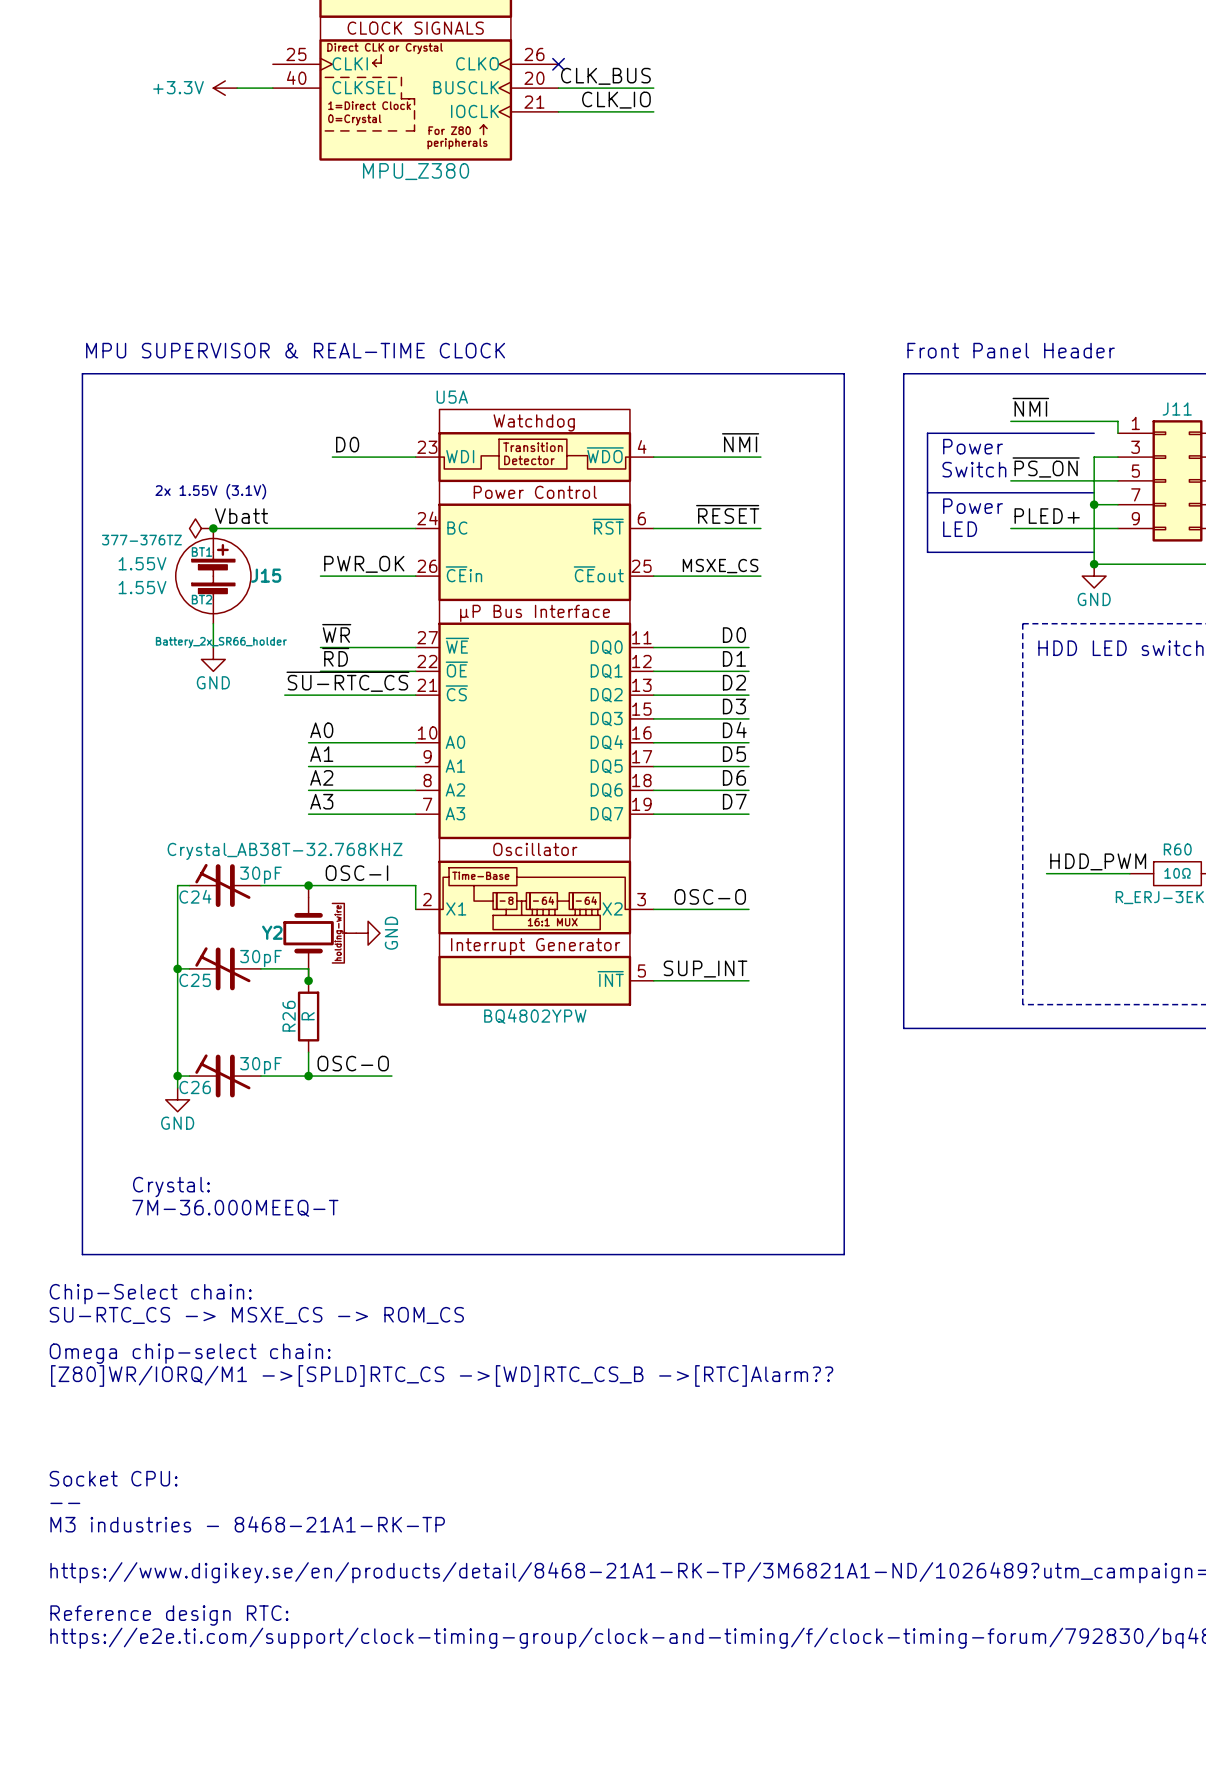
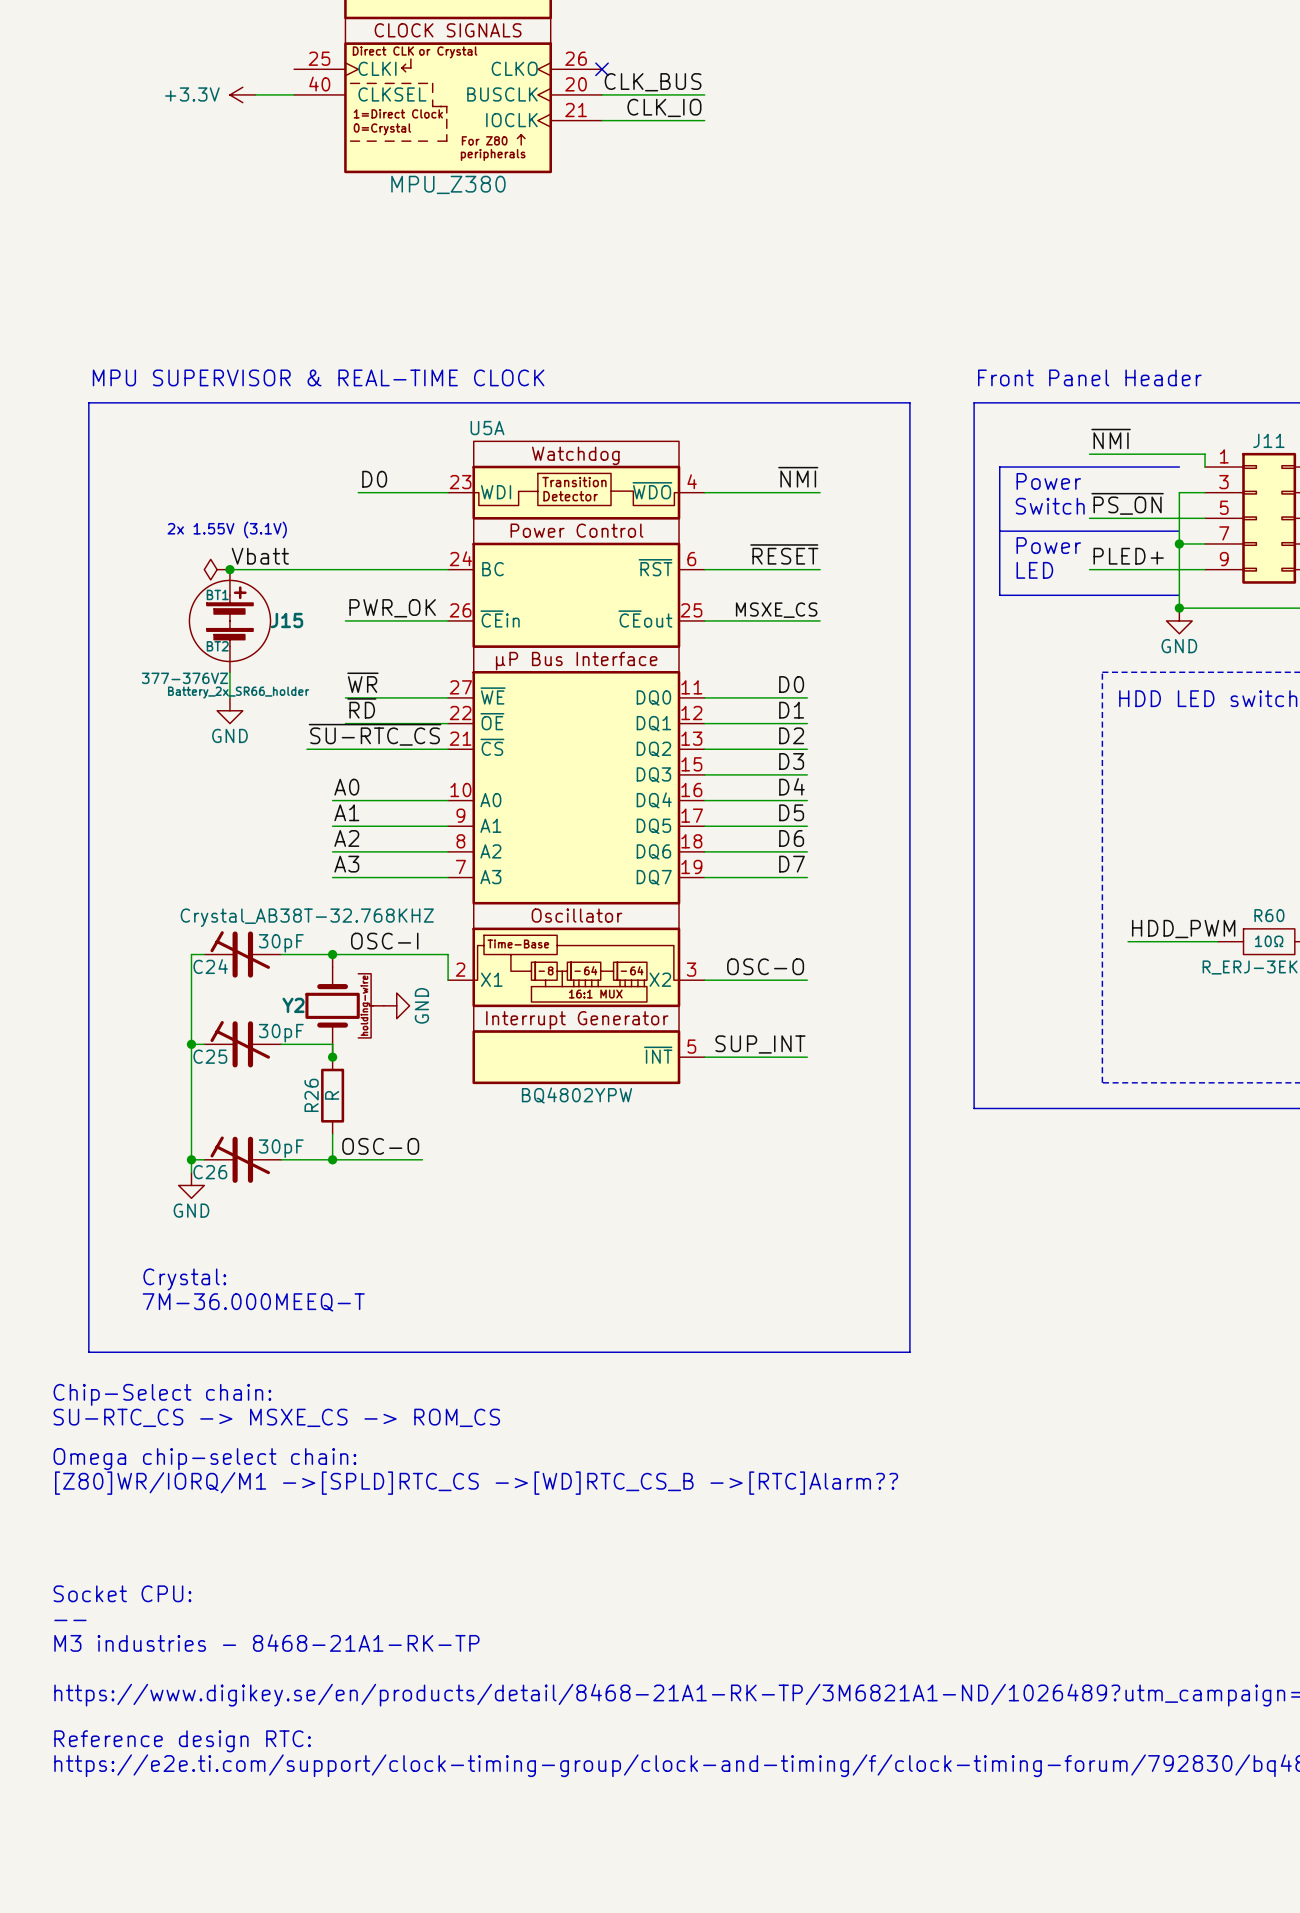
BT1 text: 377-376TZ (141, 540) -> 377-376VZ (185, 678)
BT1 text: 1.55V (142, 563) -> none
BT2 text: 1.55V (142, 587) -> none

